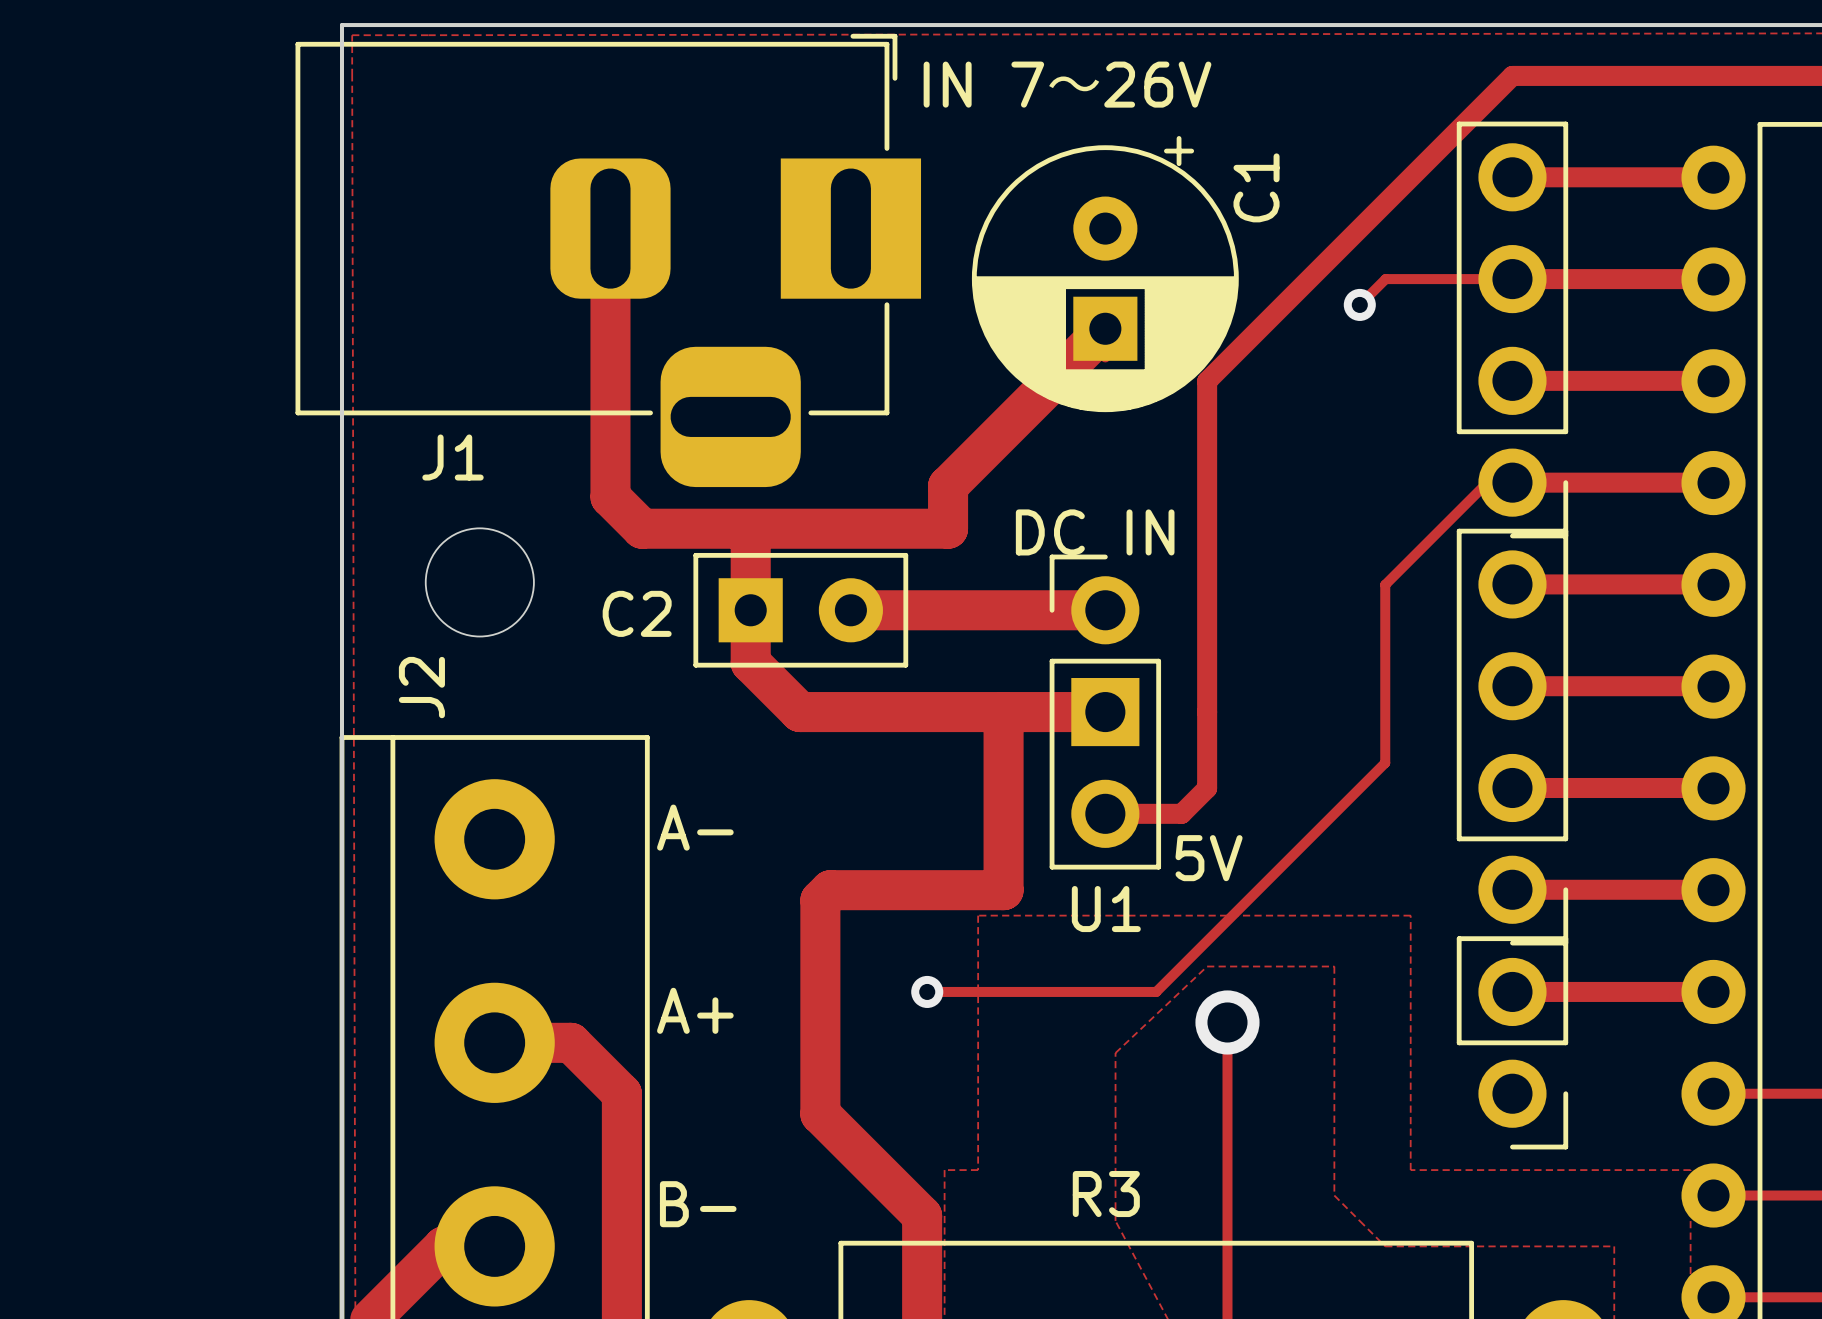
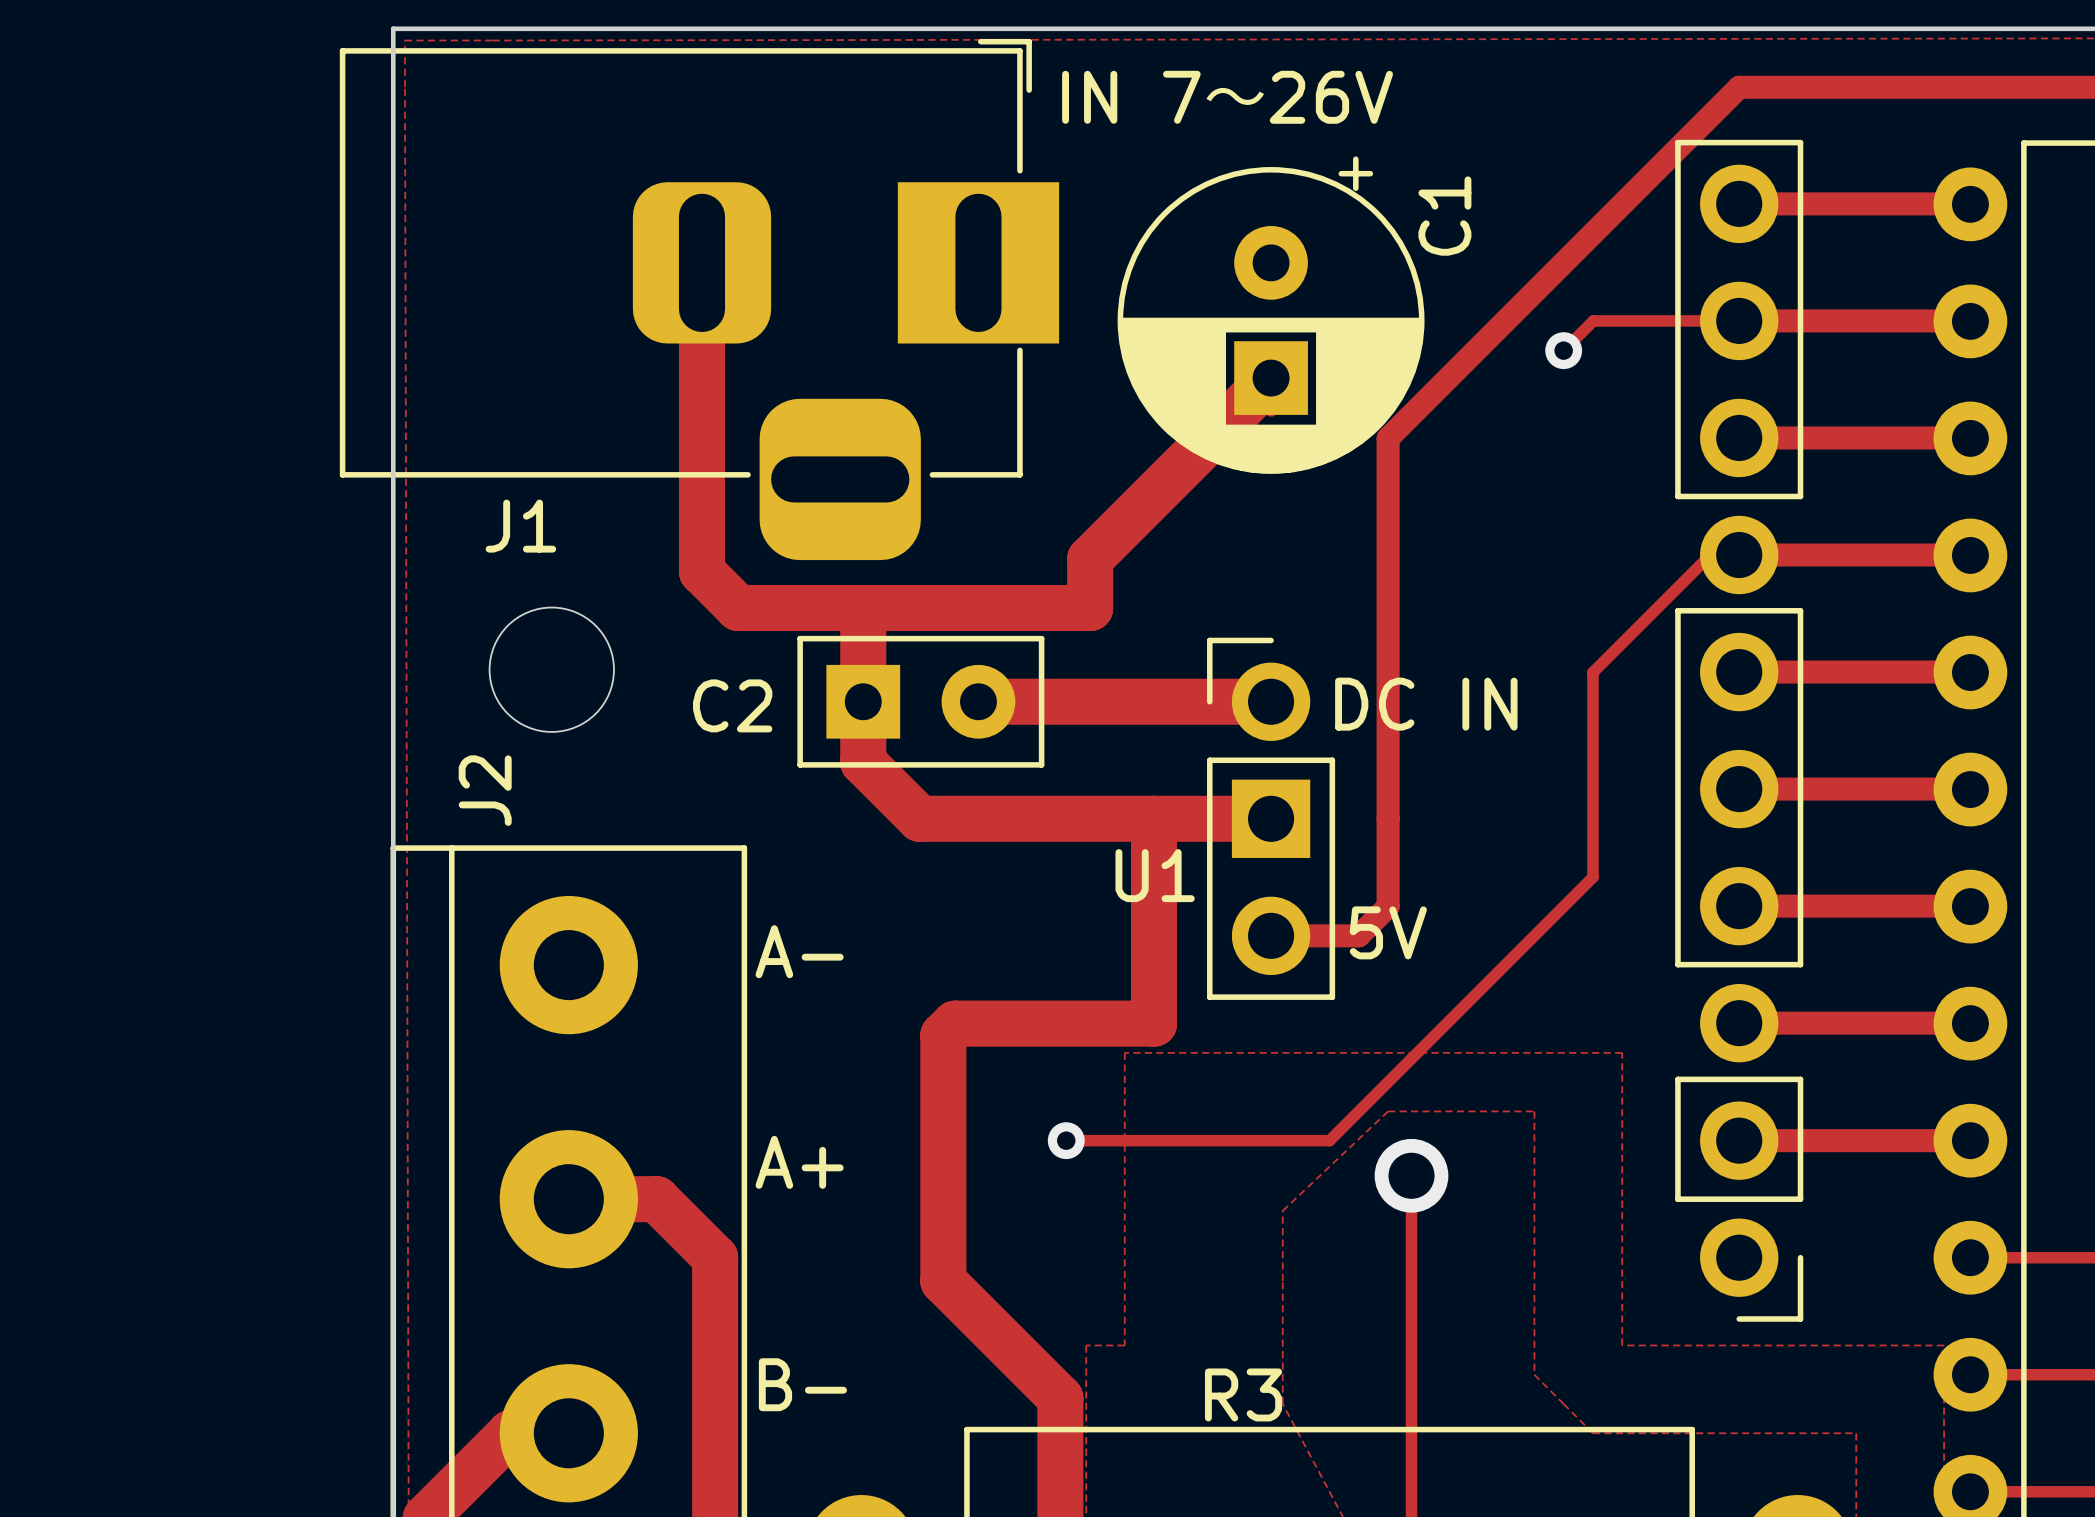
part footprint: [1456, 121, 1569, 539] -> [1675, 139, 1804, 595]
part footprint: [1456, 528, 1569, 946] -> [1675, 608, 1804, 1063]
text position: DC IN (1095, 532) -> DC IN (1426, 704)
text position: 5V (1209, 858) -> 5V (1388, 932)
U1 name position: U1 (1106, 909) -> U1 (1155, 875)
R3 name position: R3 (1106, 1194) -> R3 (1243, 1394)

